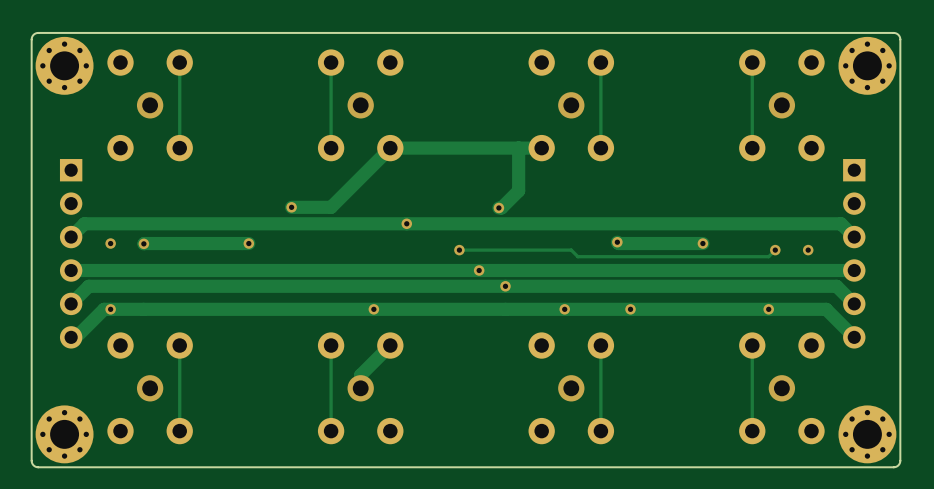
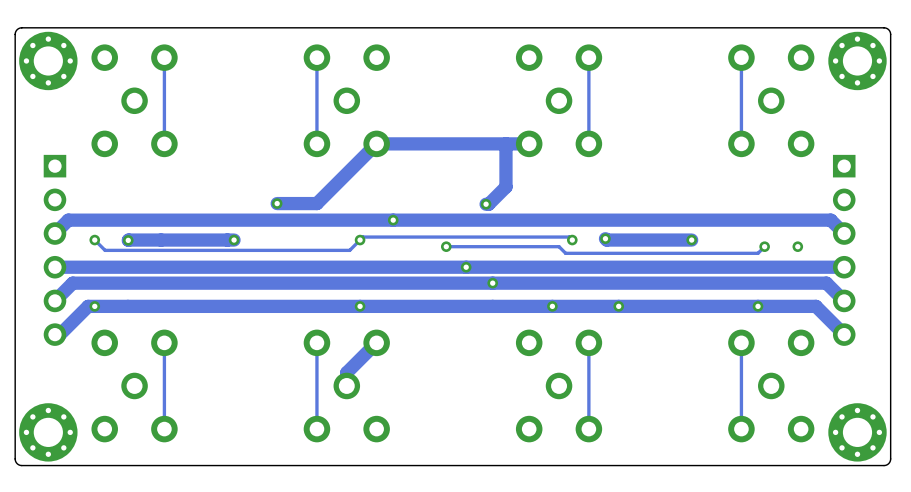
via: none -> (360, 240)
track: none -> (572, 240) (569, 237) (363, 237) (349, 250) (105, 250) (94, 240)
via: none -> (572, 240)

